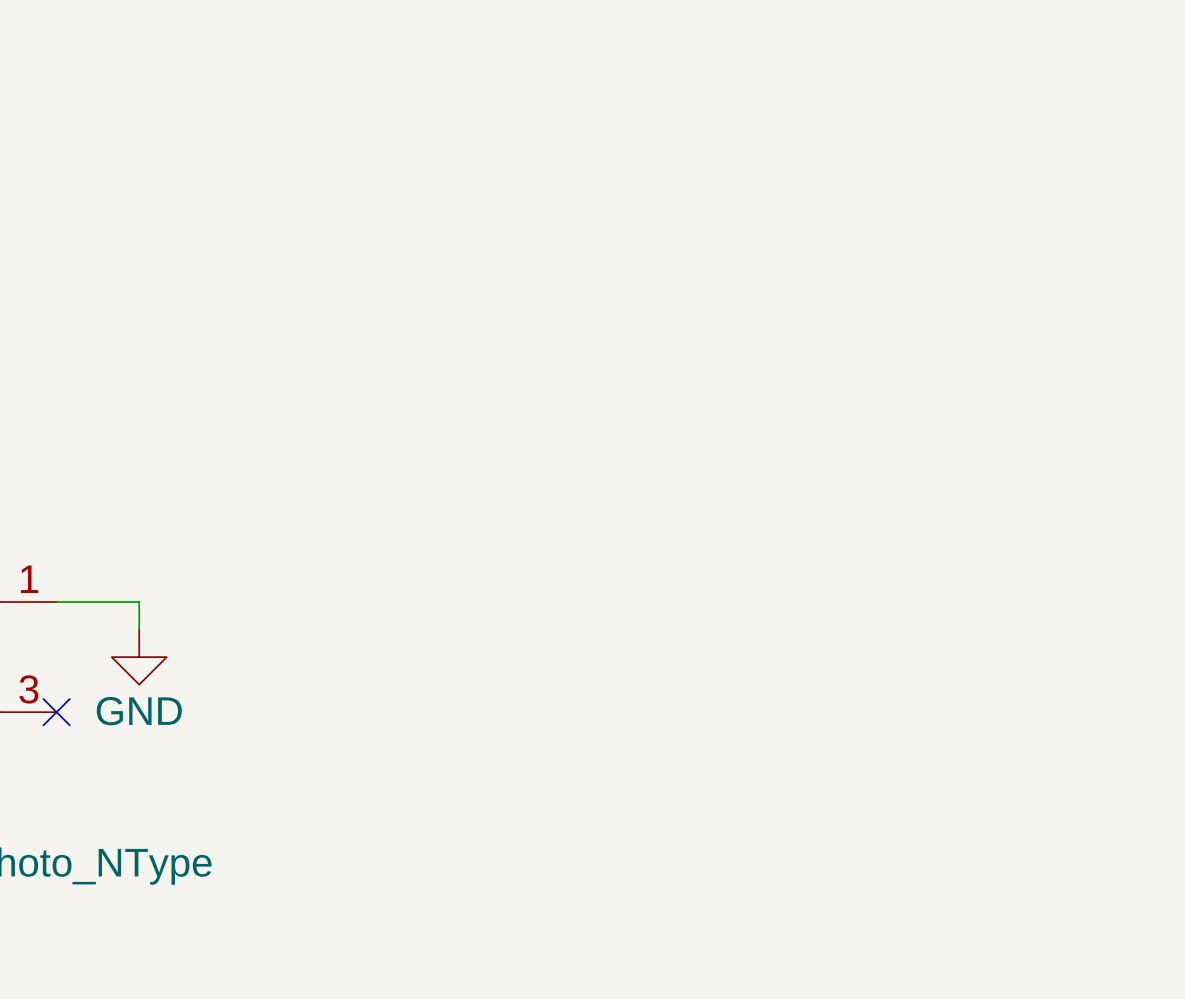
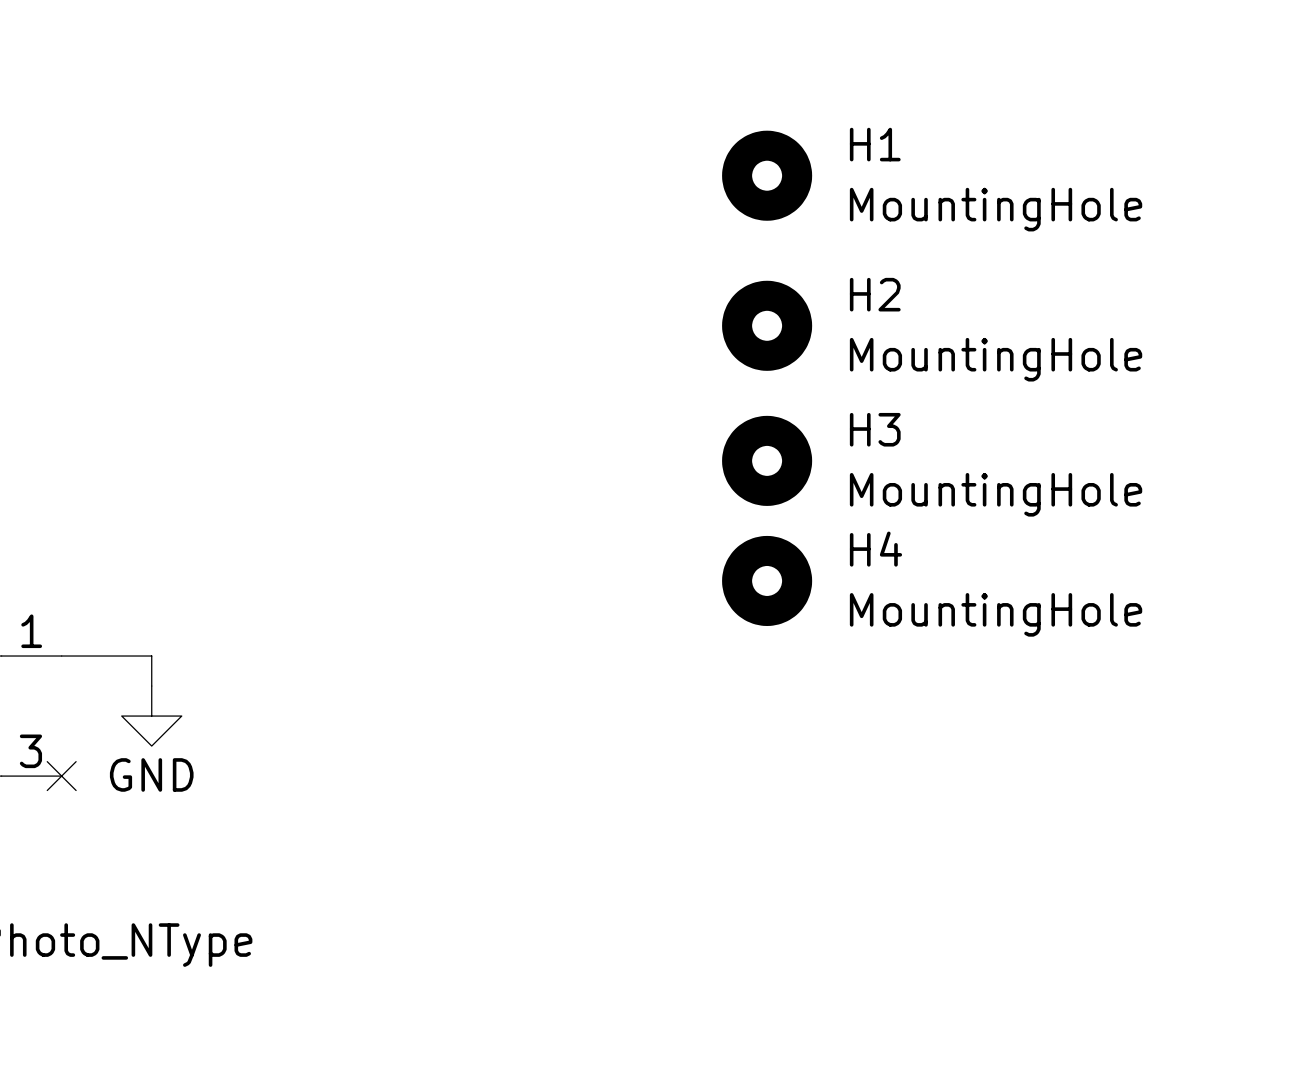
H1: none -> MountingHole (767, 175)
H2: none -> MountingHole (767, 325)
H3: none -> MountingHole (767, 460)
H4: none -> MountingHole (767, 580)

